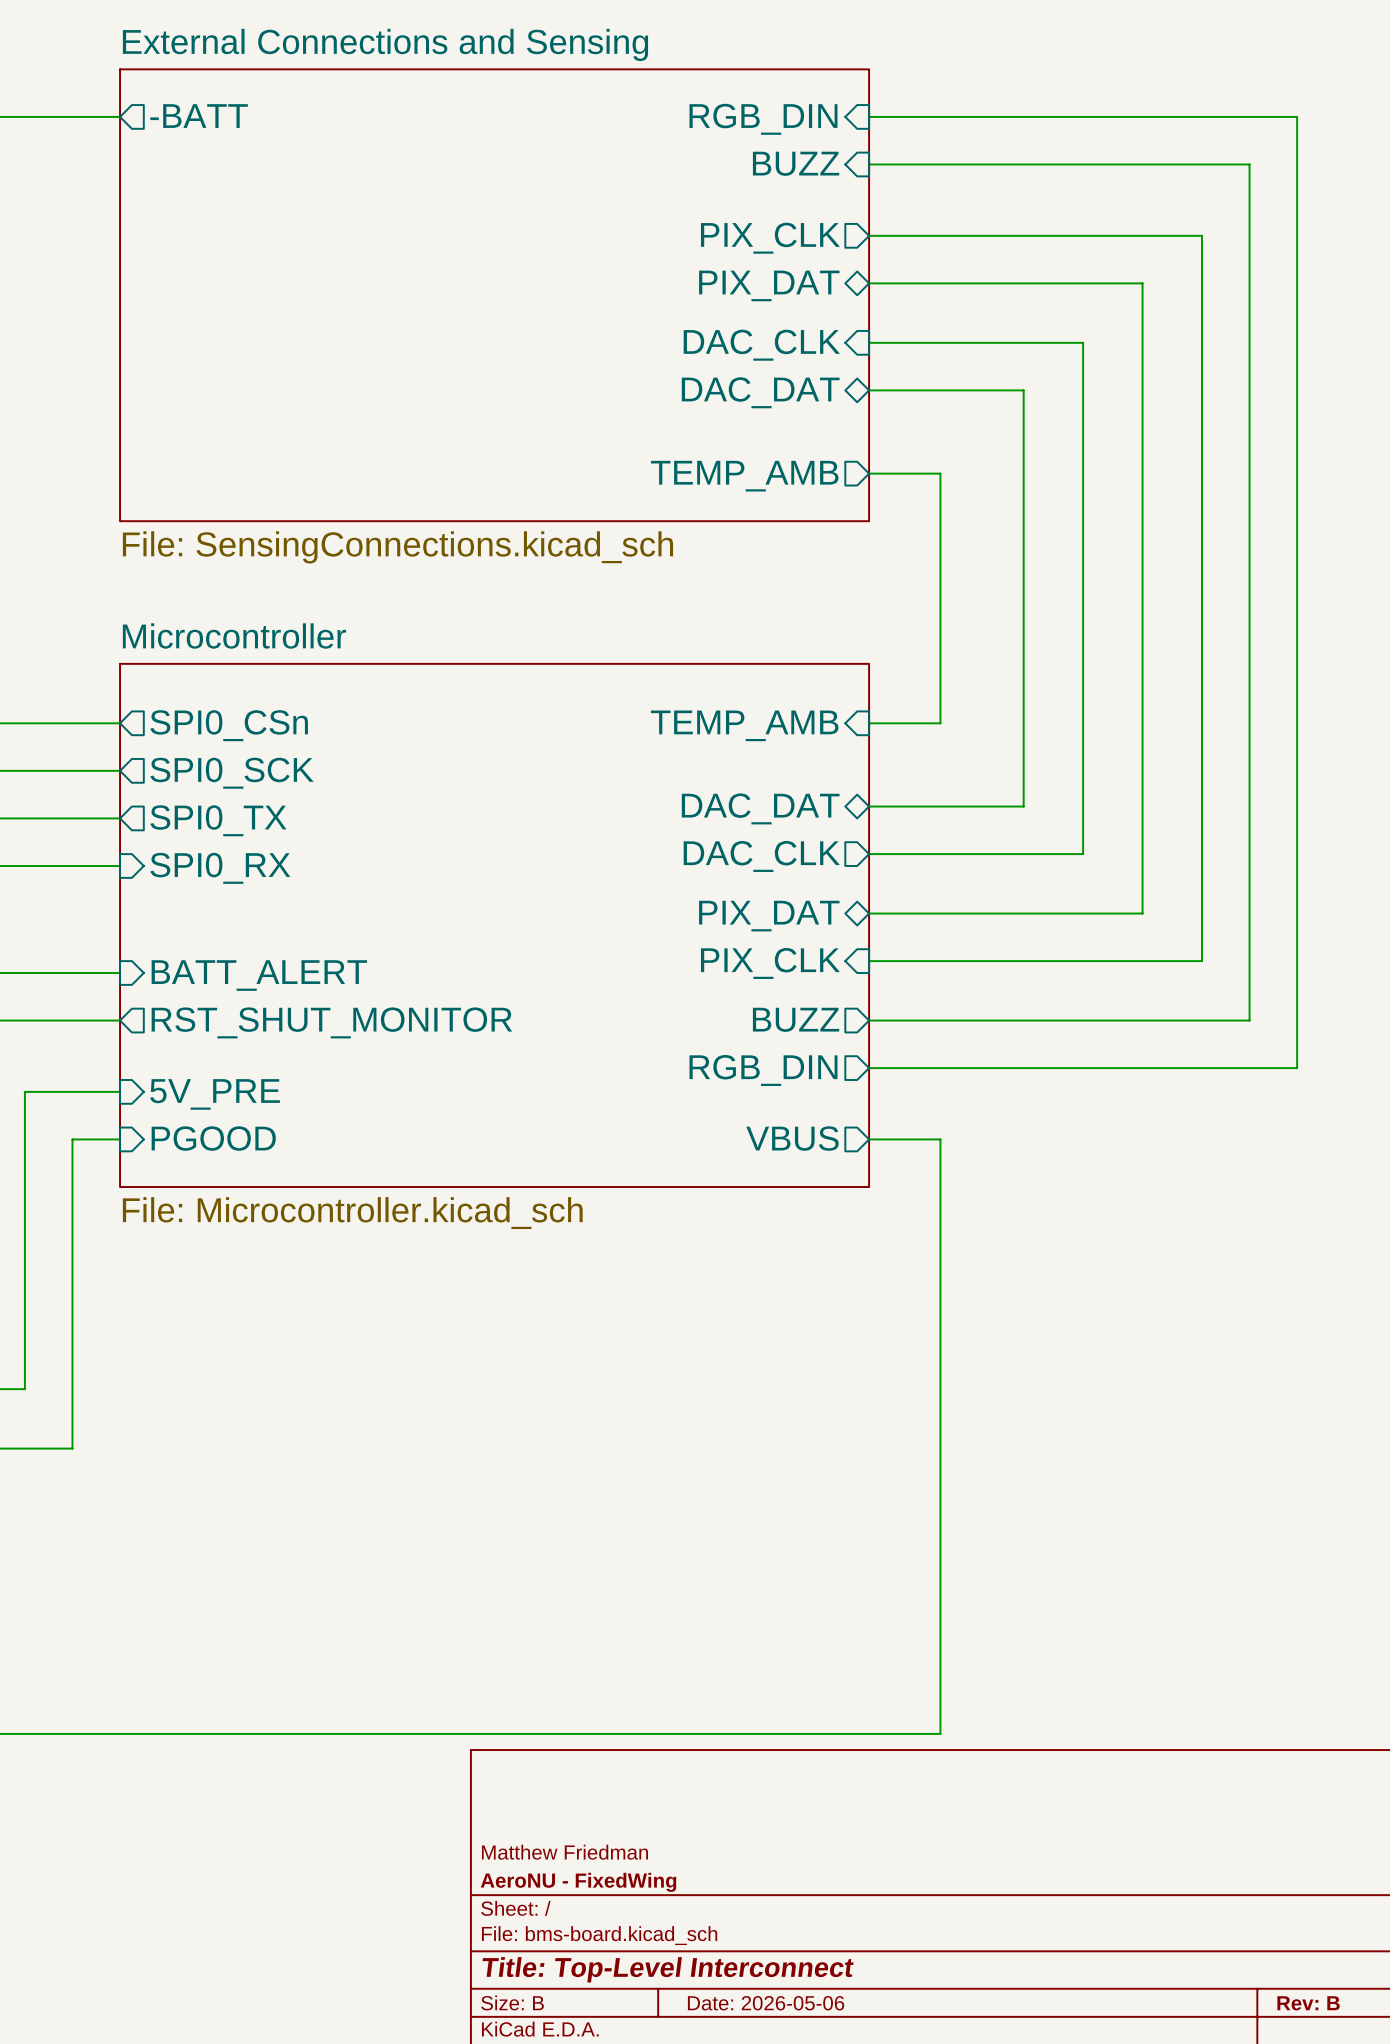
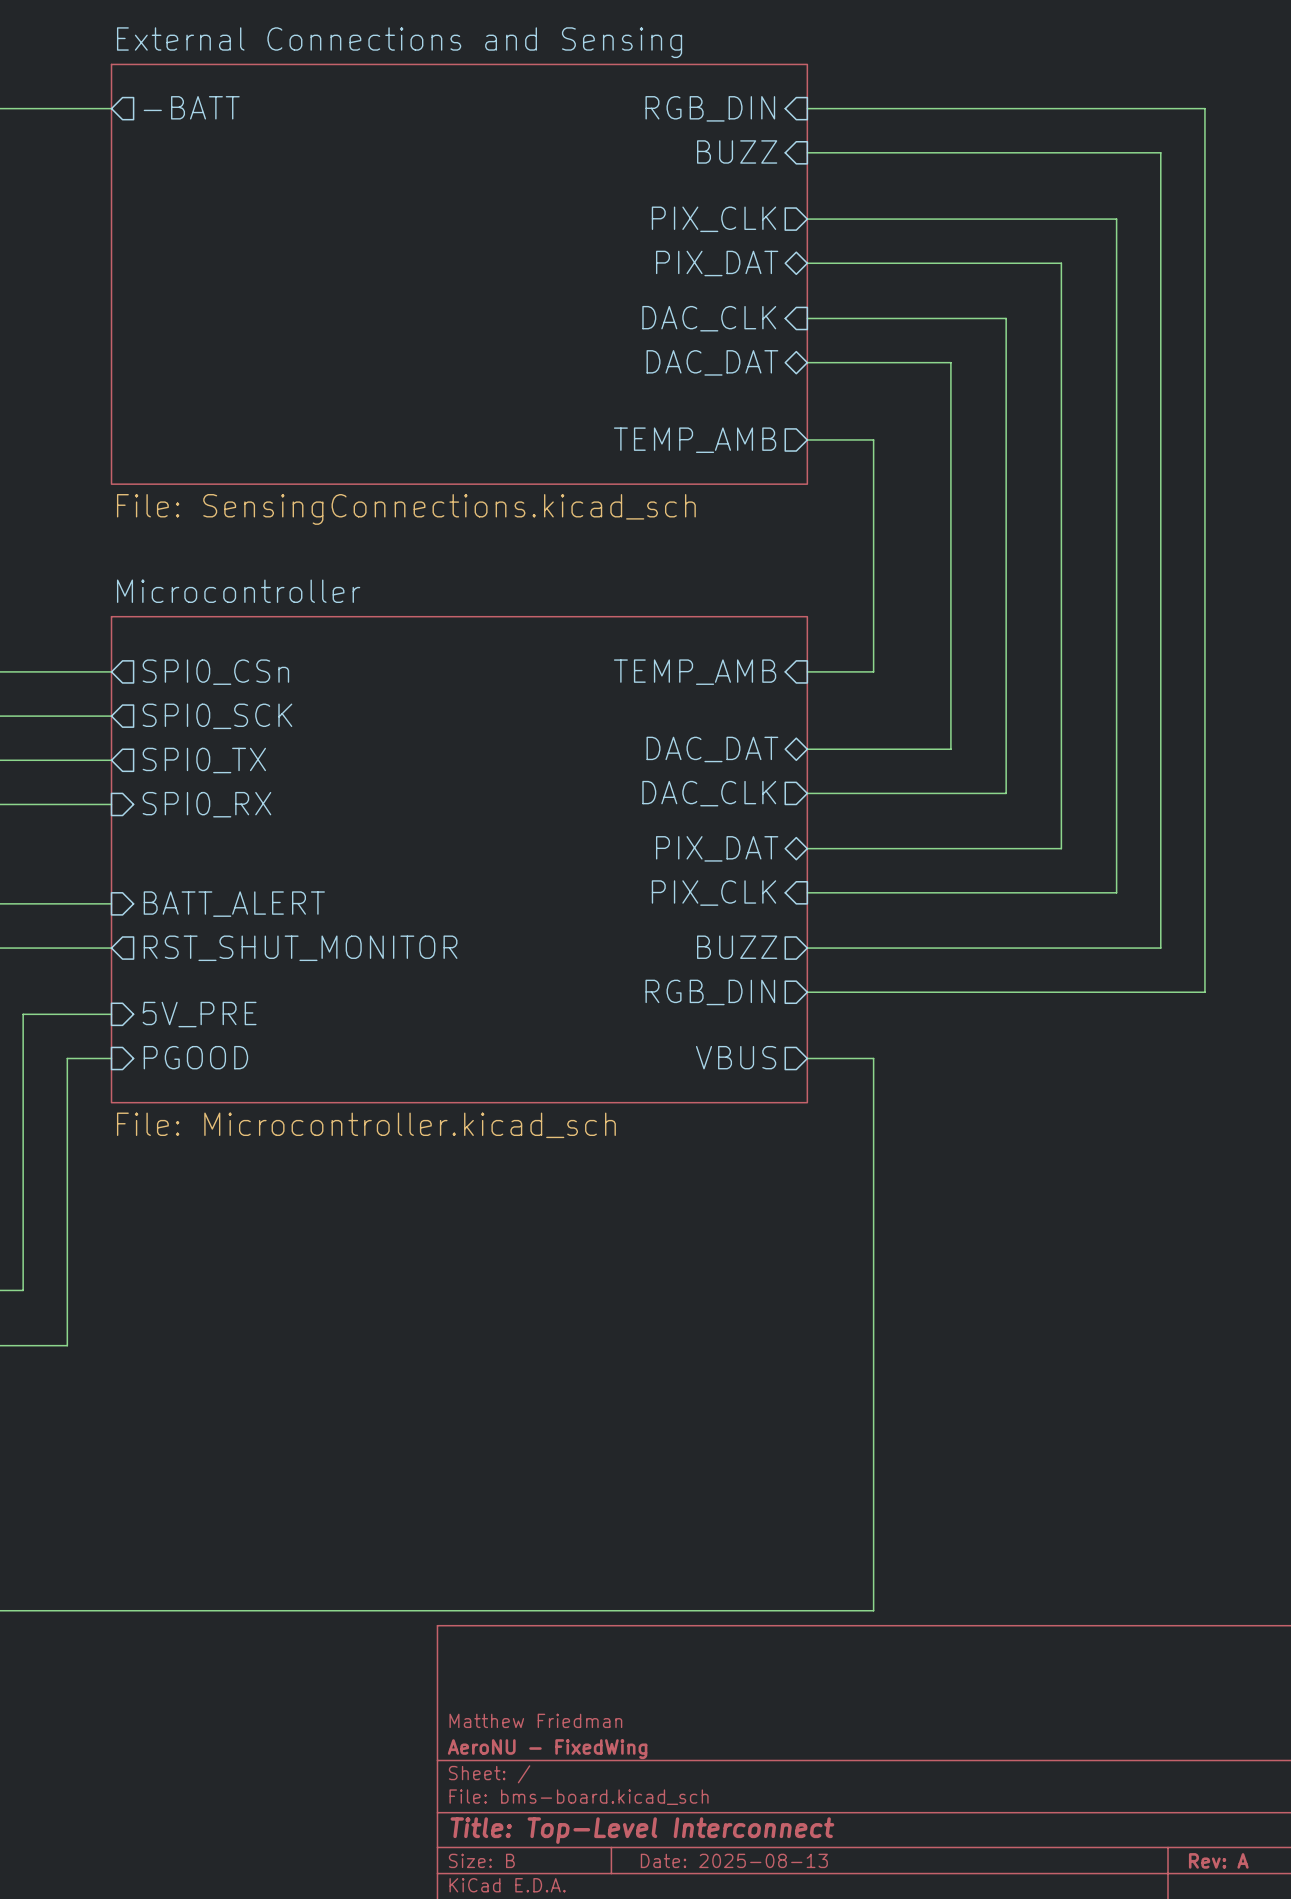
title block: Date: 2026-05-06 (766, 2003) -> Date: 2025-08-13 (734, 1860)
title block: Rev: B (1308, 2003) -> Rev: A (1218, 1860)

